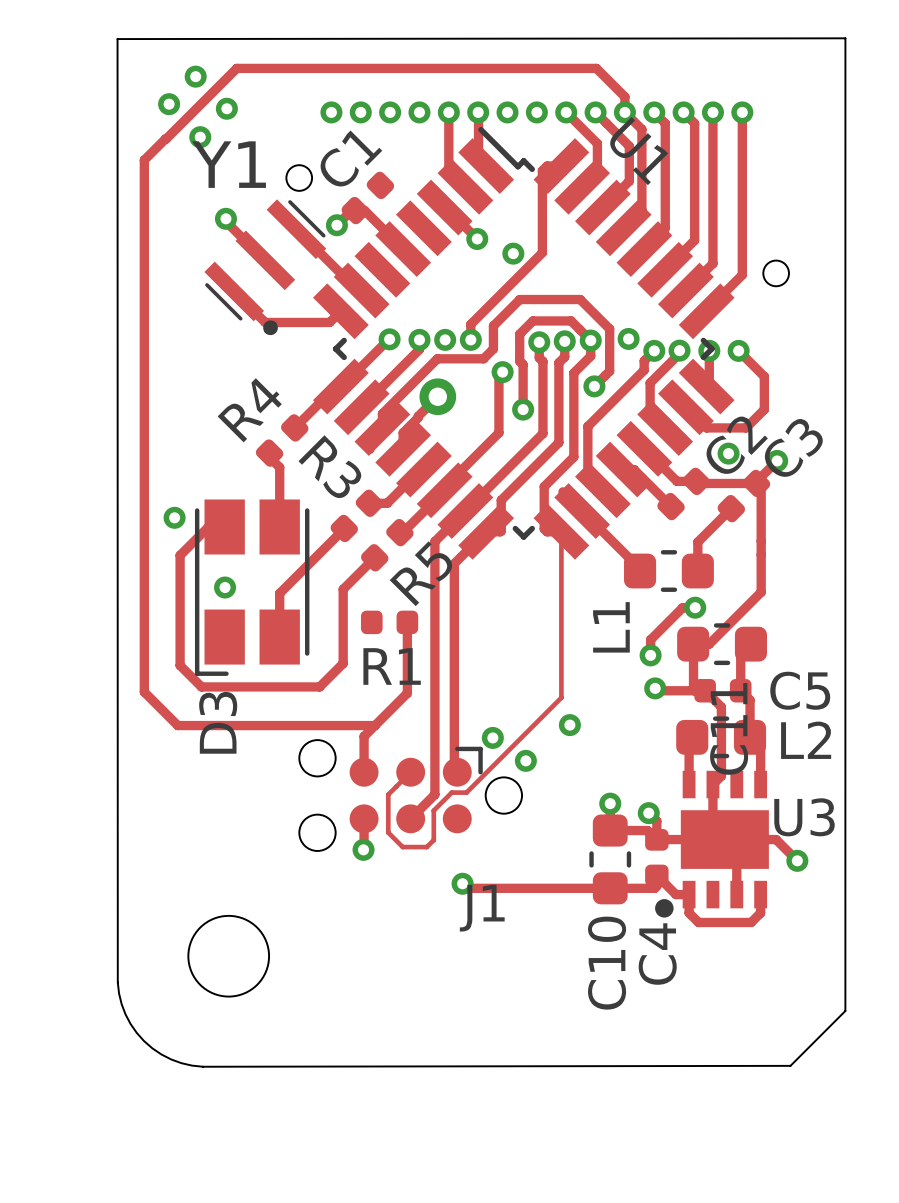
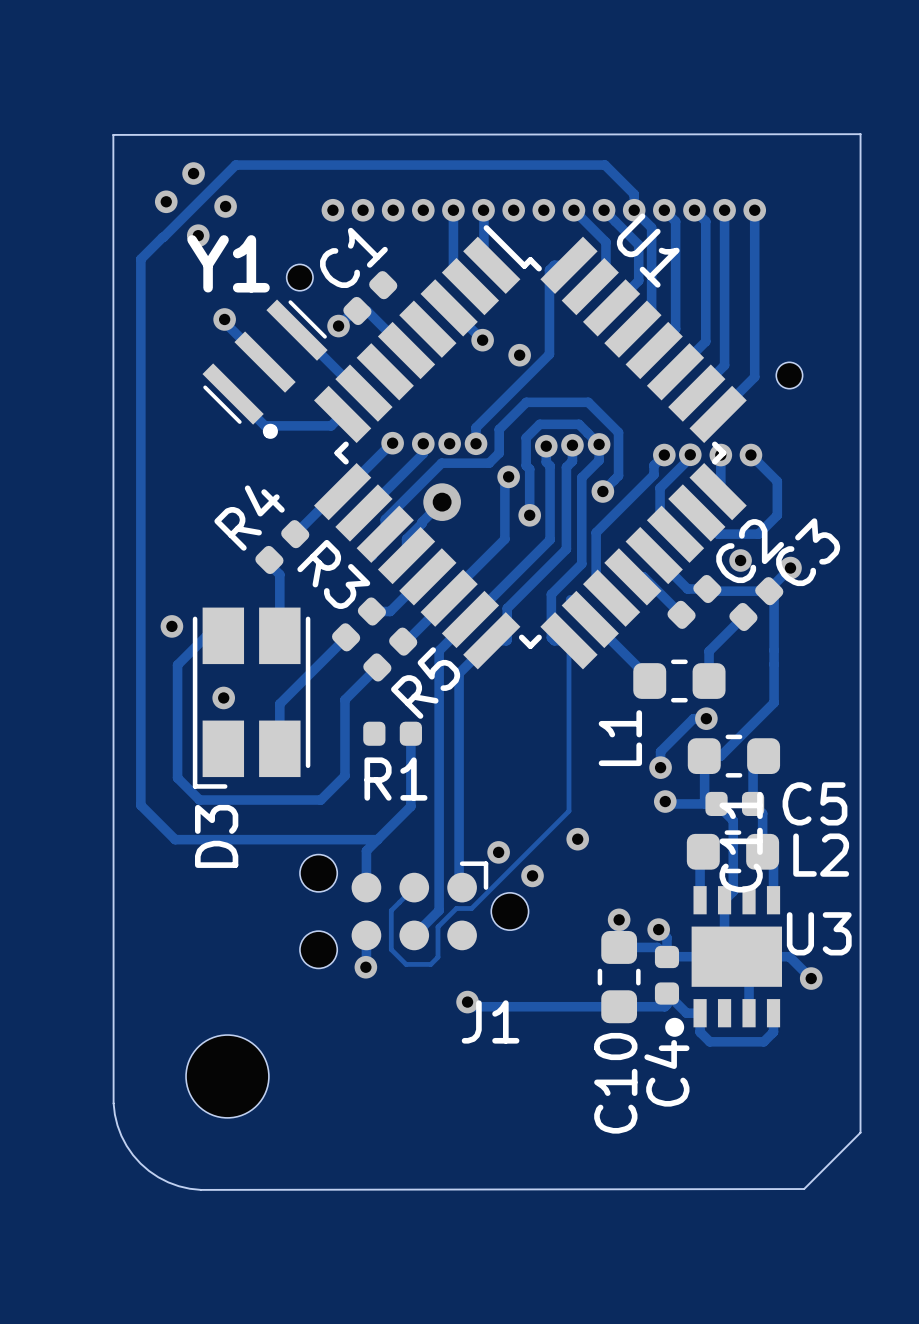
via: (628, 338) -> none

